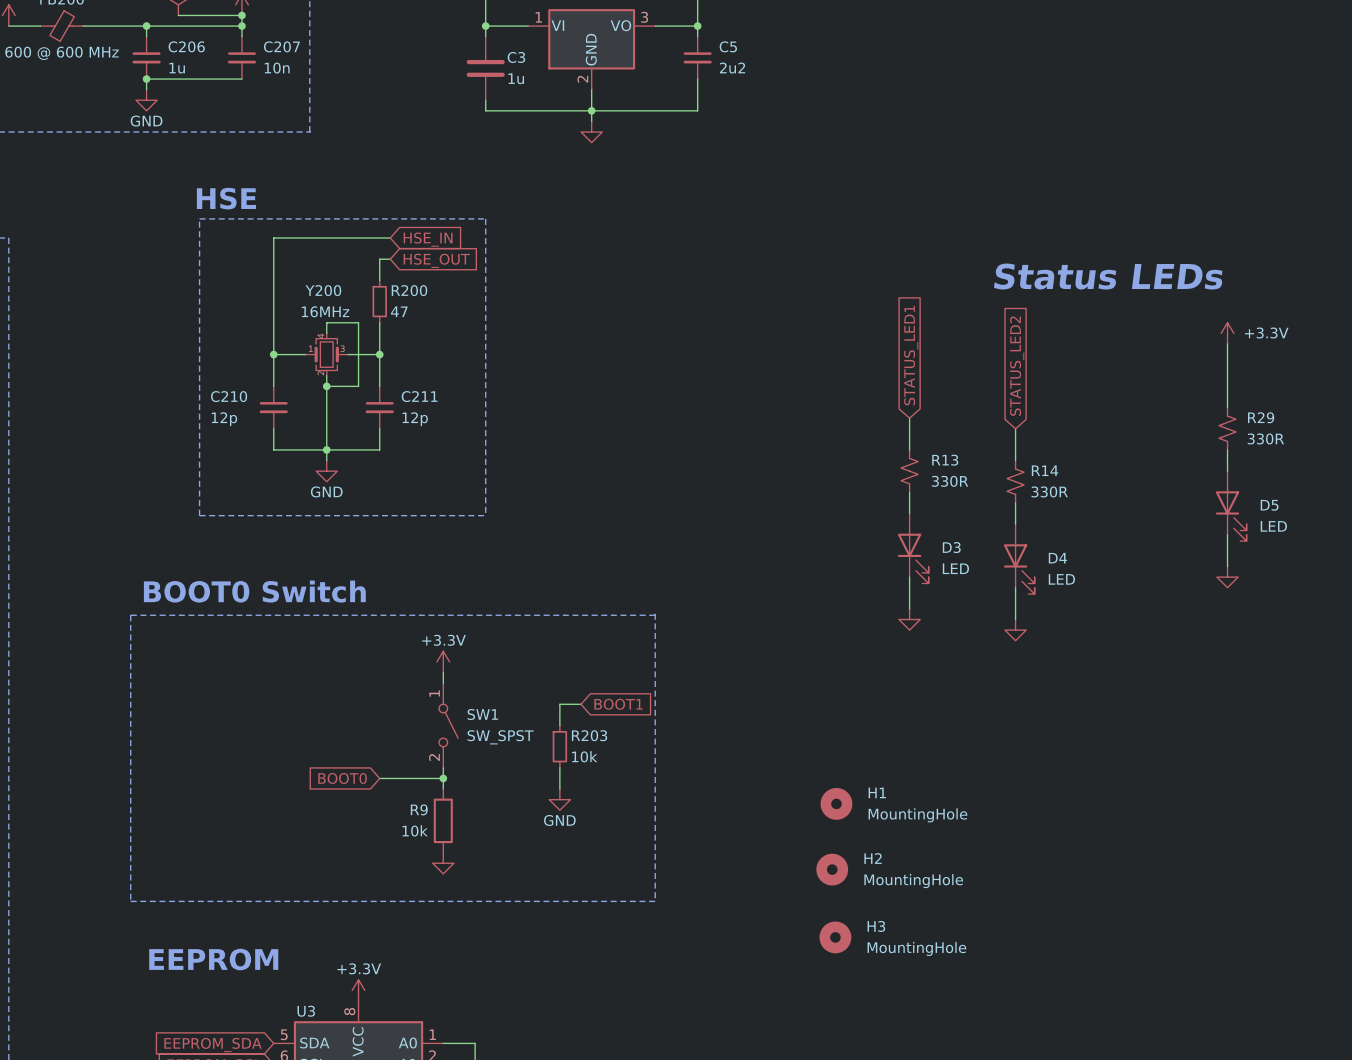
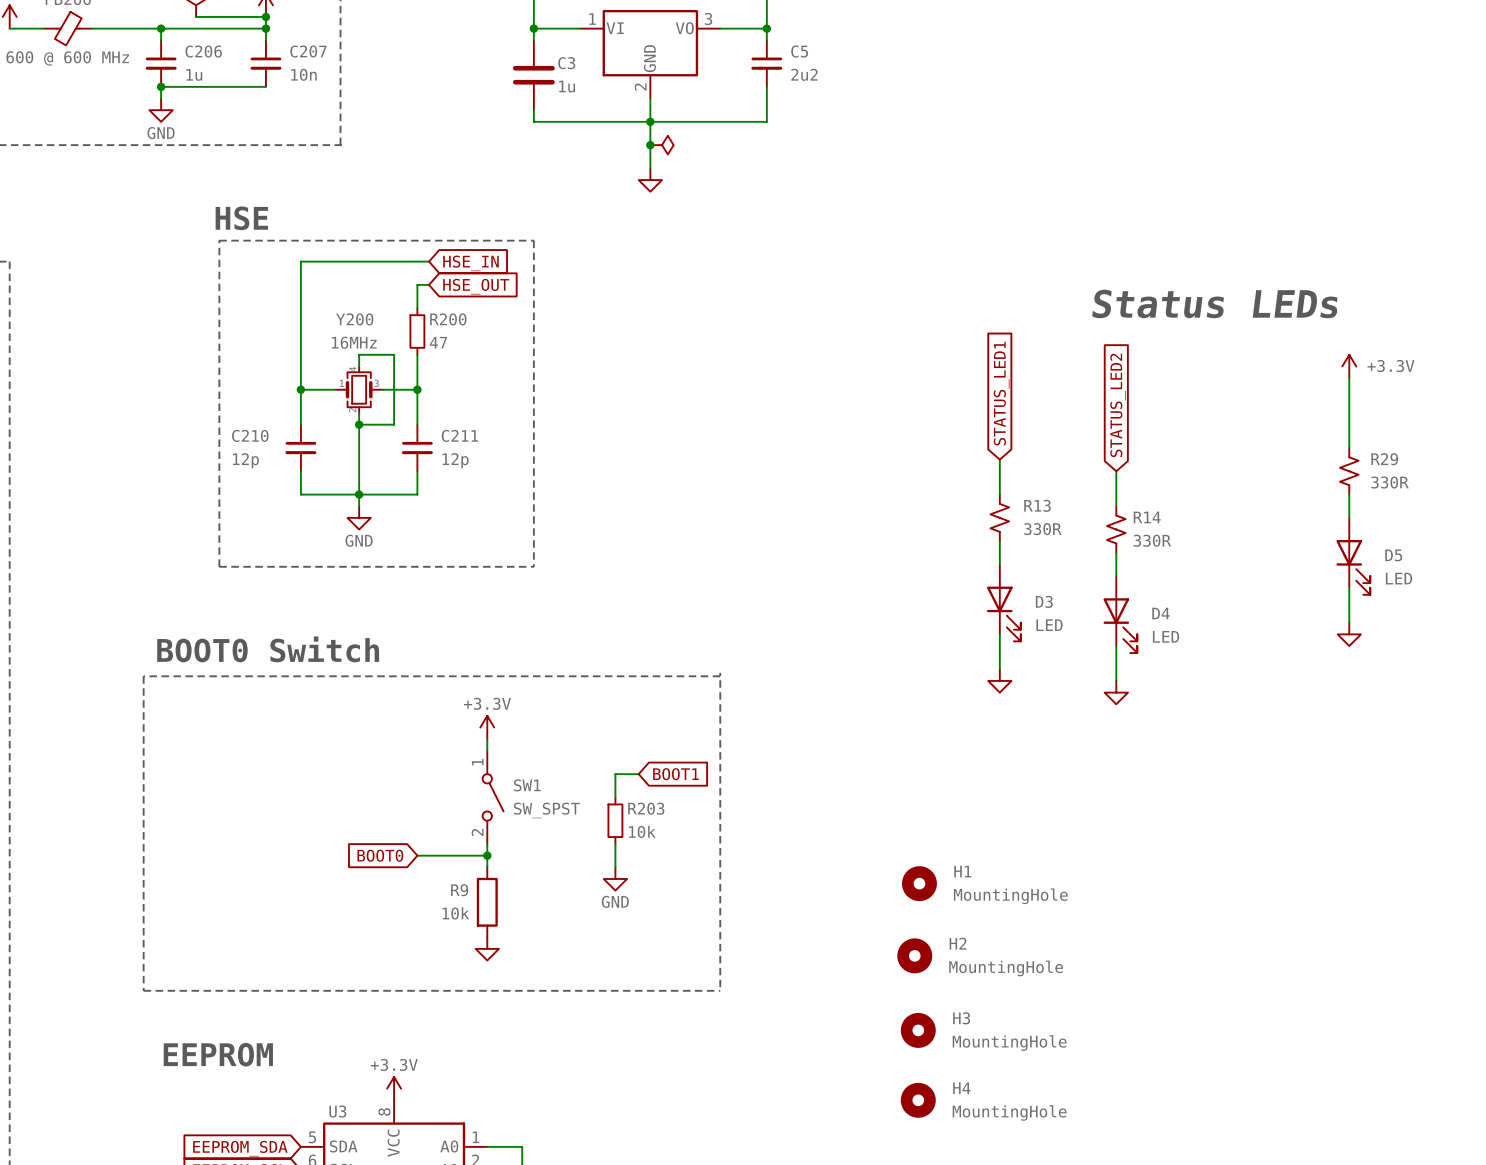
wire: none -> (650, 133) (650, 168)
power symbol position: (591, 132) -> (650, 180)
junction: none -> (650, 145)
power symbol: none -> (662, 145)
H4: none -> MountingHole (918, 1100)

